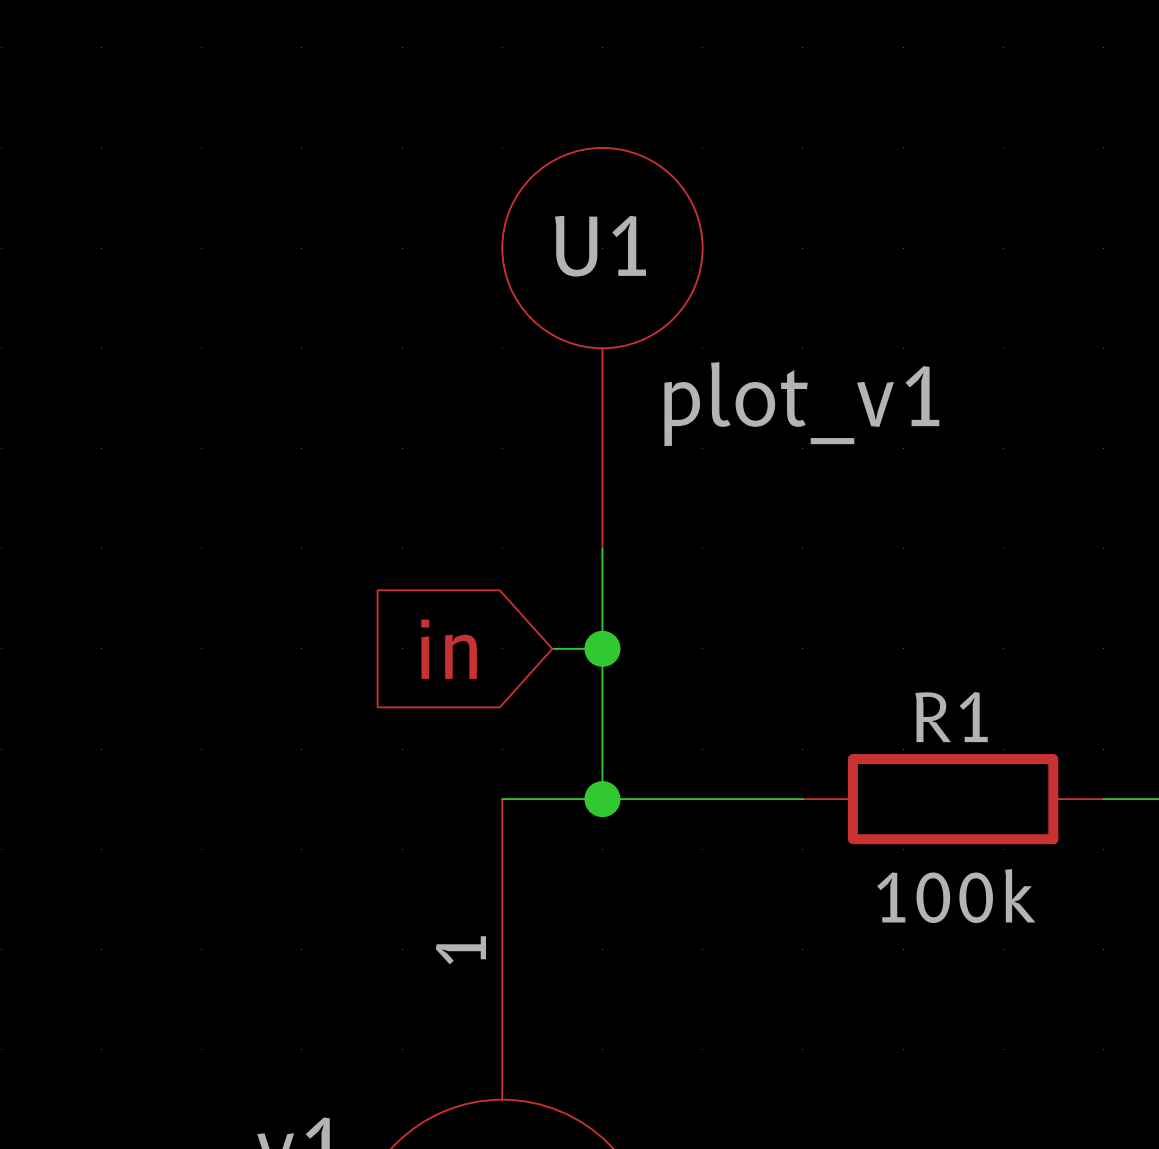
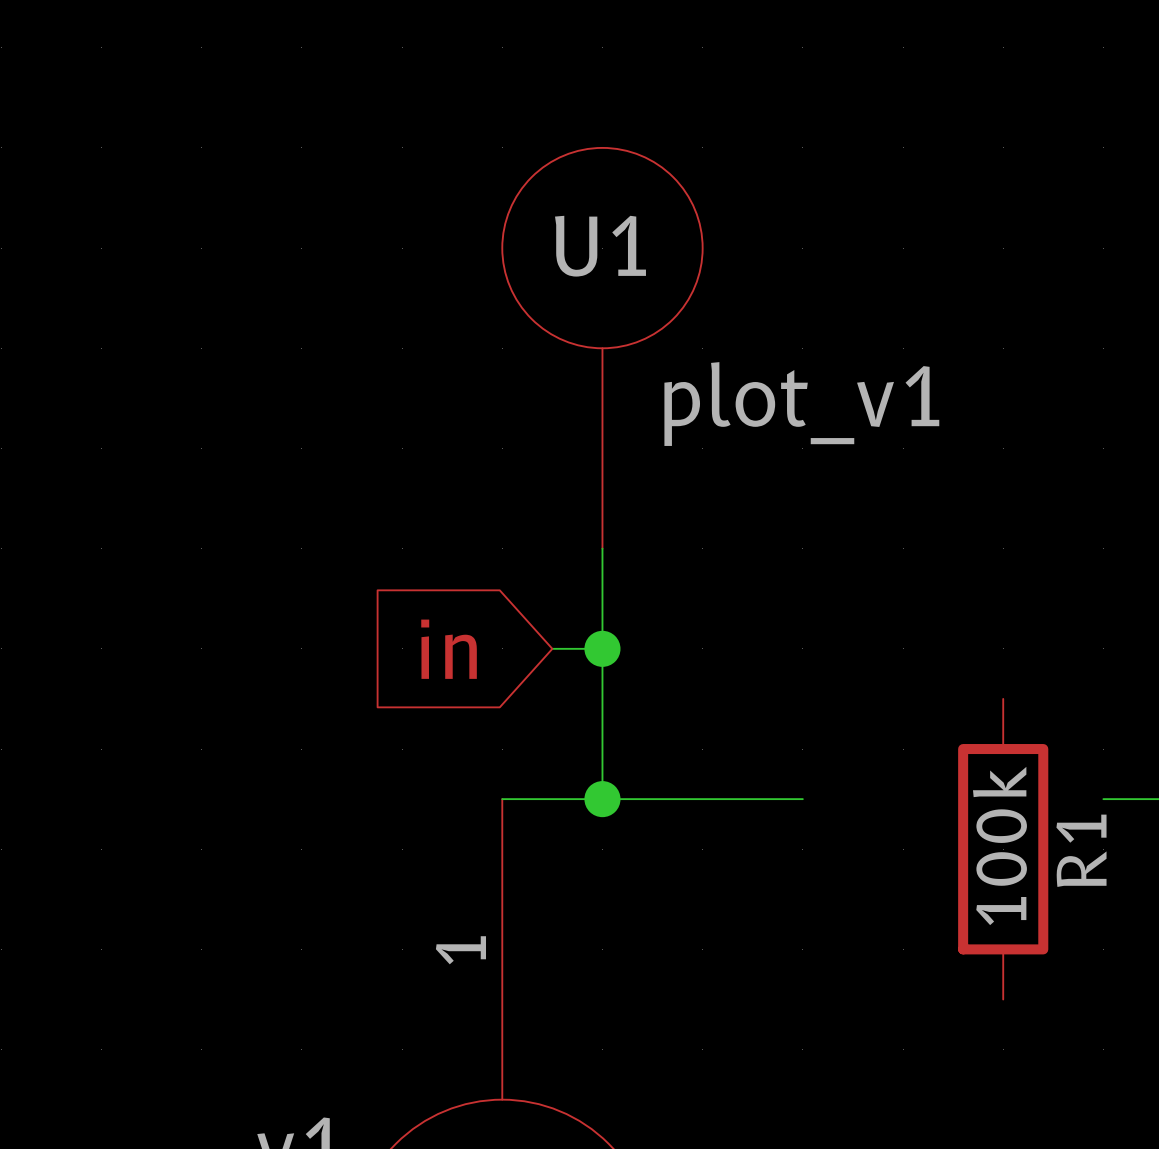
R1 rotation: 0° (953, 799) -> 90° clockwise (1003, 849)
R1 value position: 100k (956, 896) -> 100k (999, 845)

